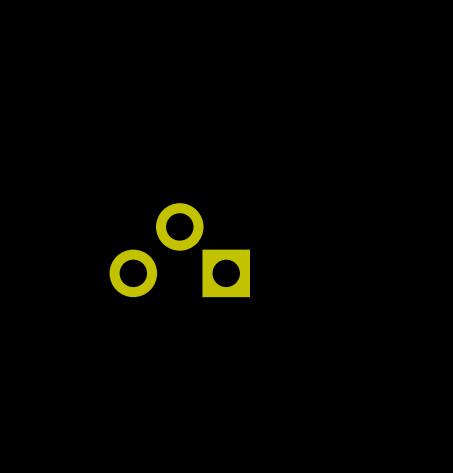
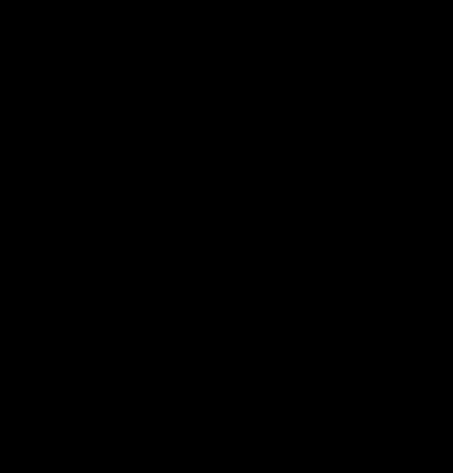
part: (179, 250) -> none

